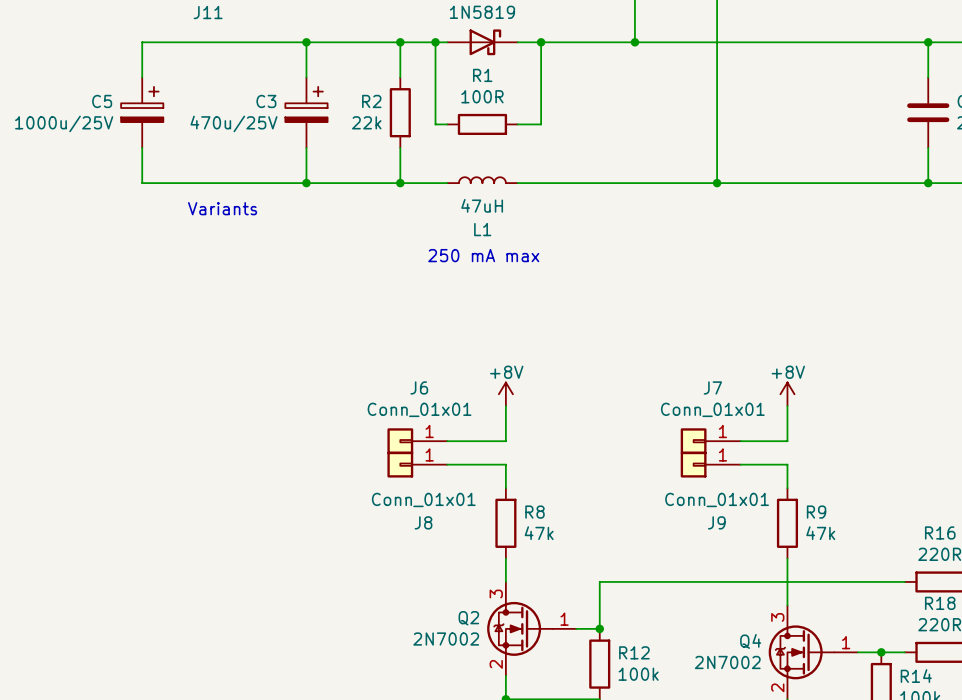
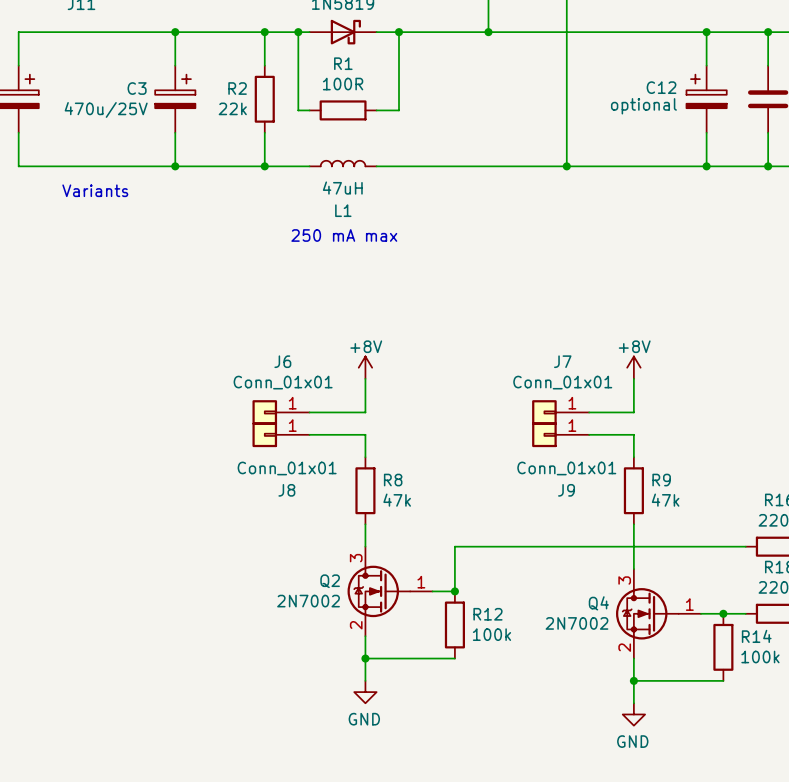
wire: none -> (706, 32) (706, 65)
junction: none -> (706, 32)
C12: none -> optional (706, 99)
wire: none -> (706, 132) (706, 166)
junction: none -> (706, 166)

